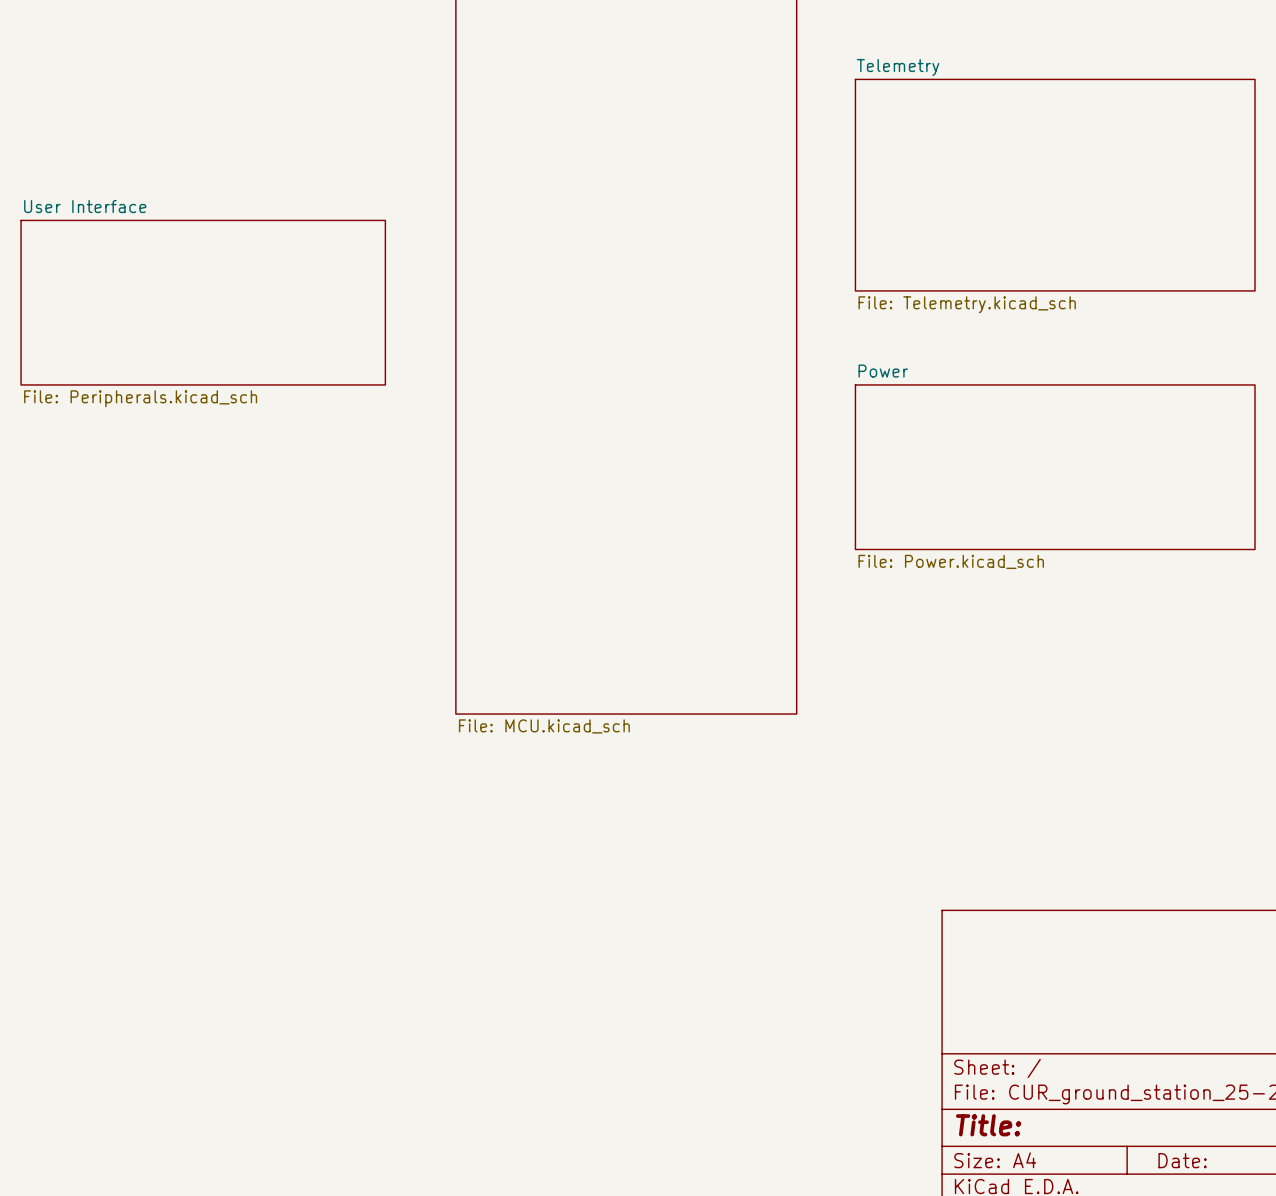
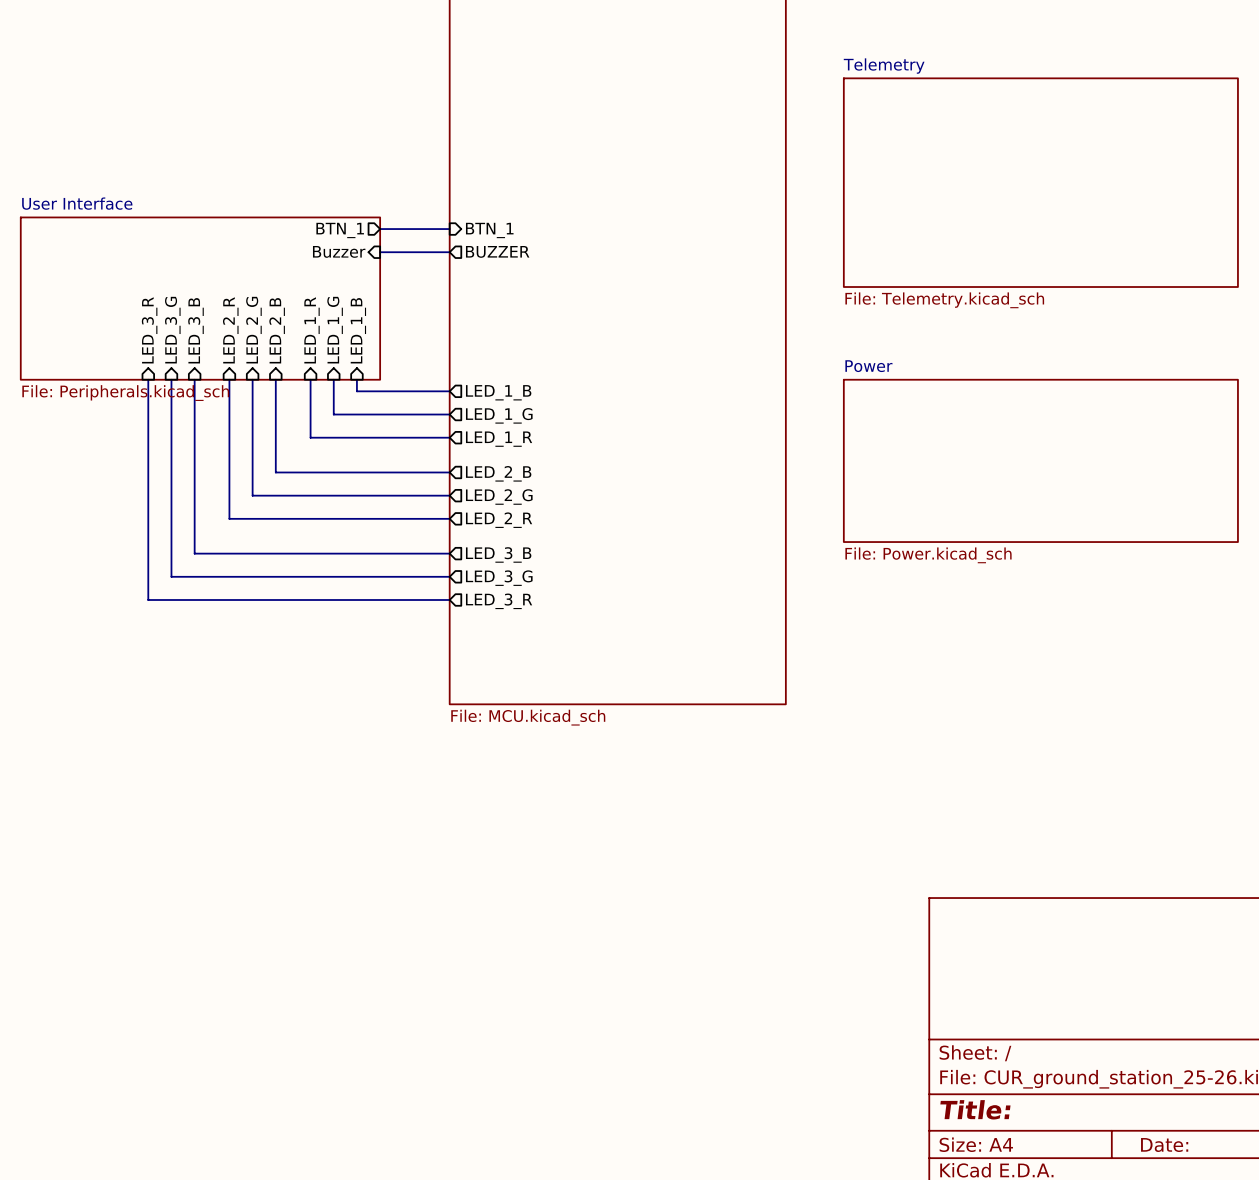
sheet pin: none -> BTN_1 (340, 230)
wire: none -> (380, 229) (449, 229)
sheet pin: none -> BTN_1 (489, 230)
sheet pin: none -> Buzzer (339, 251)
wire: none -> (380, 252) (449, 252)
sheet pin: none -> BUZZER (497, 251)
sheet pin: none -> LED_3_R (149, 330)
sheet pin: none -> LED_3_G (172, 330)
sheet pin: none -> LED_3_B (195, 330)
sheet pin: none -> LED_2_R (230, 330)
sheet pin: none -> LED_2_G (253, 330)
sheet pin: none -> LED_2_B (277, 330)
sheet pin: none -> LED_1_R (312, 330)
sheet pin: none -> LED_1_G (335, 330)
sheet pin: none -> LED_1_B (358, 330)
wire: none -> (148, 379) (148, 599) (449, 599)
wire: none -> (171, 379) (171, 576) (449, 576)
wire: none -> (194, 379) (194, 553) (449, 553)
wire: none -> (229, 379) (229, 518) (449, 518)
wire: none -> (252, 379) (252, 495) (449, 495)
wire: none -> (275, 379) (275, 472) (449, 472)
wire: none -> (310, 379) (310, 437) (449, 437)
wire: none -> (333, 379) (333, 414) (449, 414)
wire: none -> (356, 379) (356, 391) (449, 391)
sheet pin: none -> LED_1_B (498, 392)
sheet pin: none -> LED_1_G (499, 415)
sheet pin: none -> LED_1_R (499, 439)
sheet pin: none -> LED_2_B (498, 473)
sheet pin: none -> LED_2_G (499, 497)
sheet pin: none -> LED_2_R (499, 520)
sheet pin: none -> LED_3_B (498, 554)
sheet pin: none -> LED_3_G (499, 578)
sheet pin: none -> LED_3_R (499, 601)

